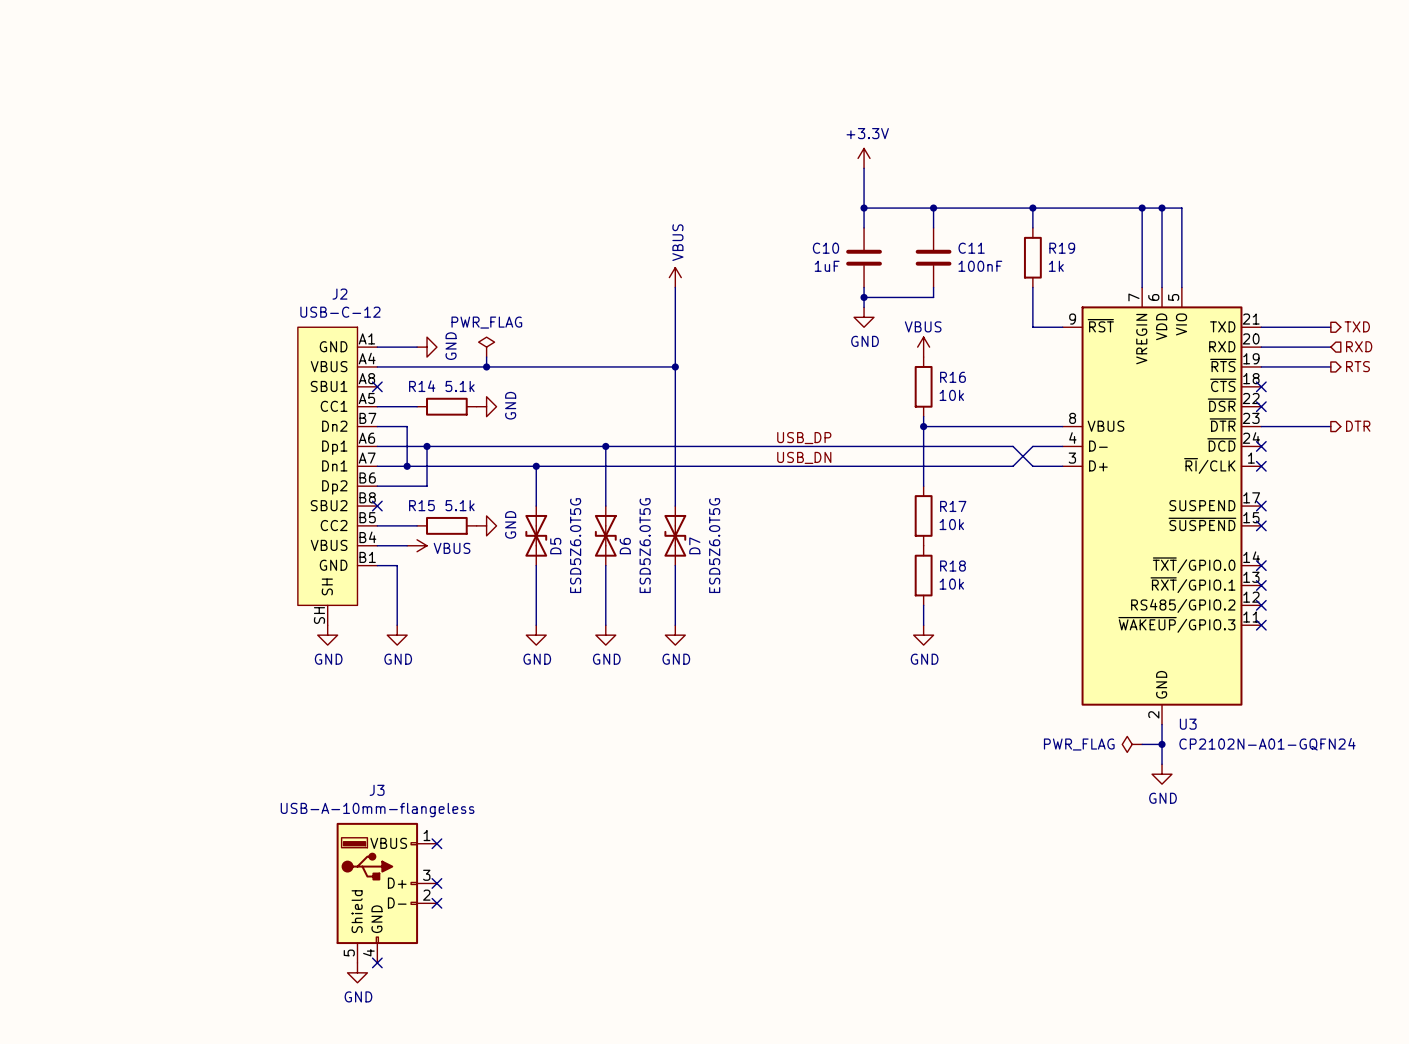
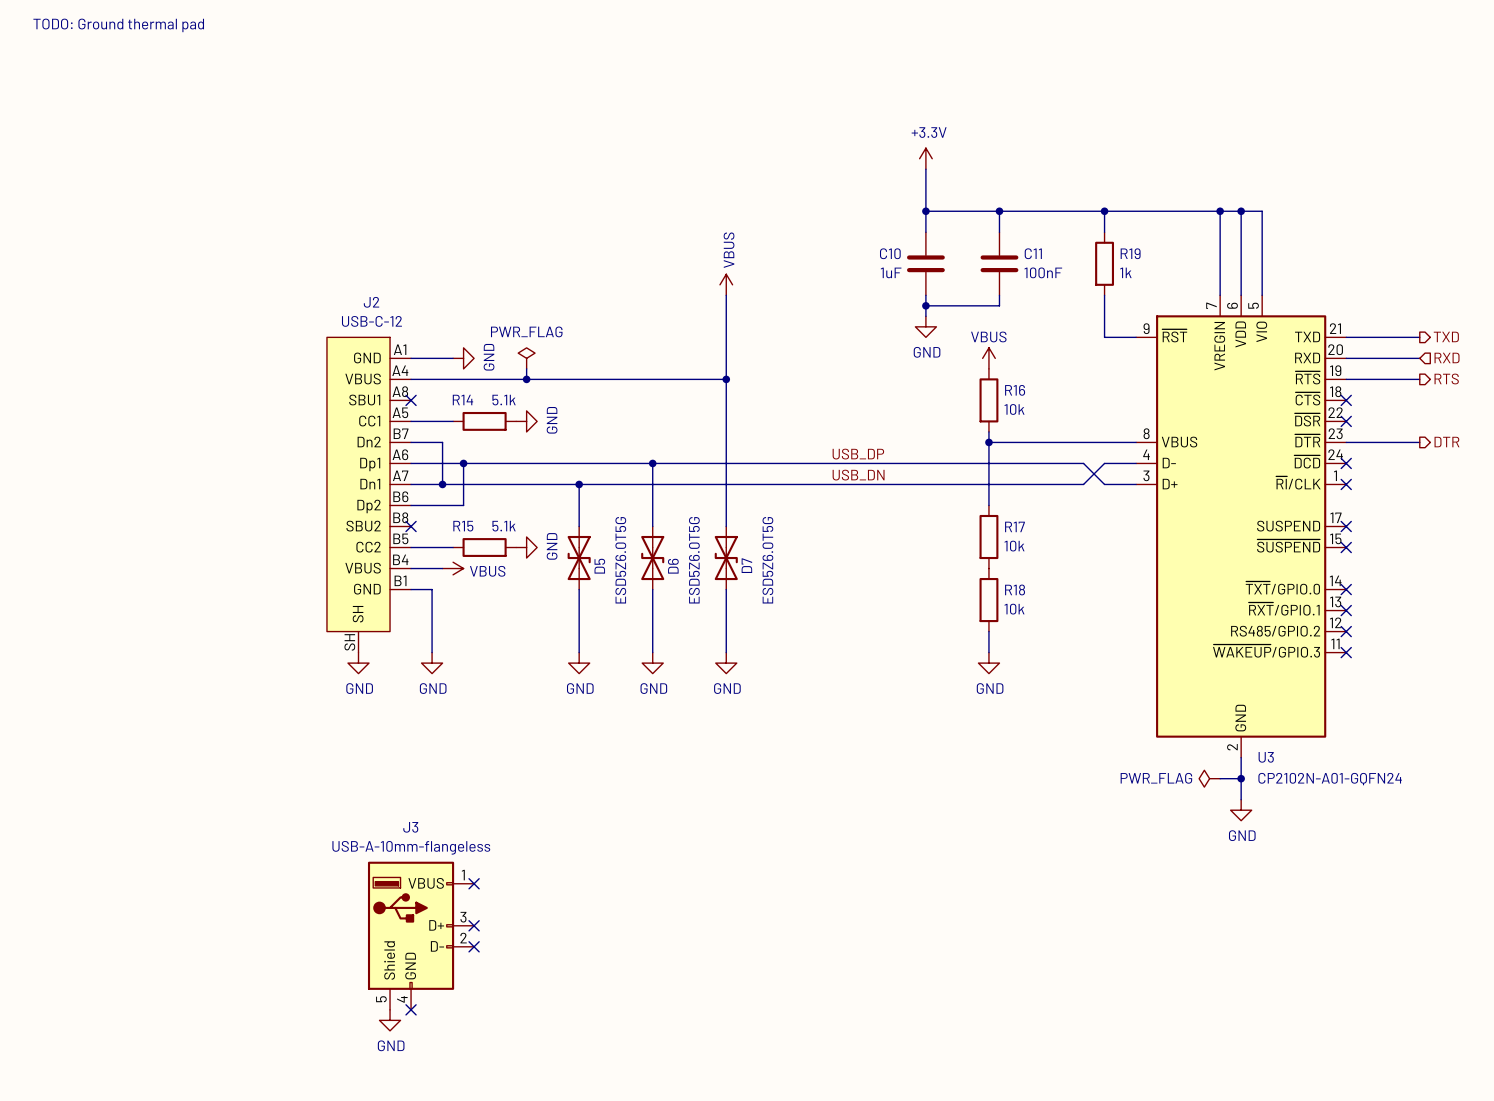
text: none -> TODO: Ground thermal pad (118, 25)

